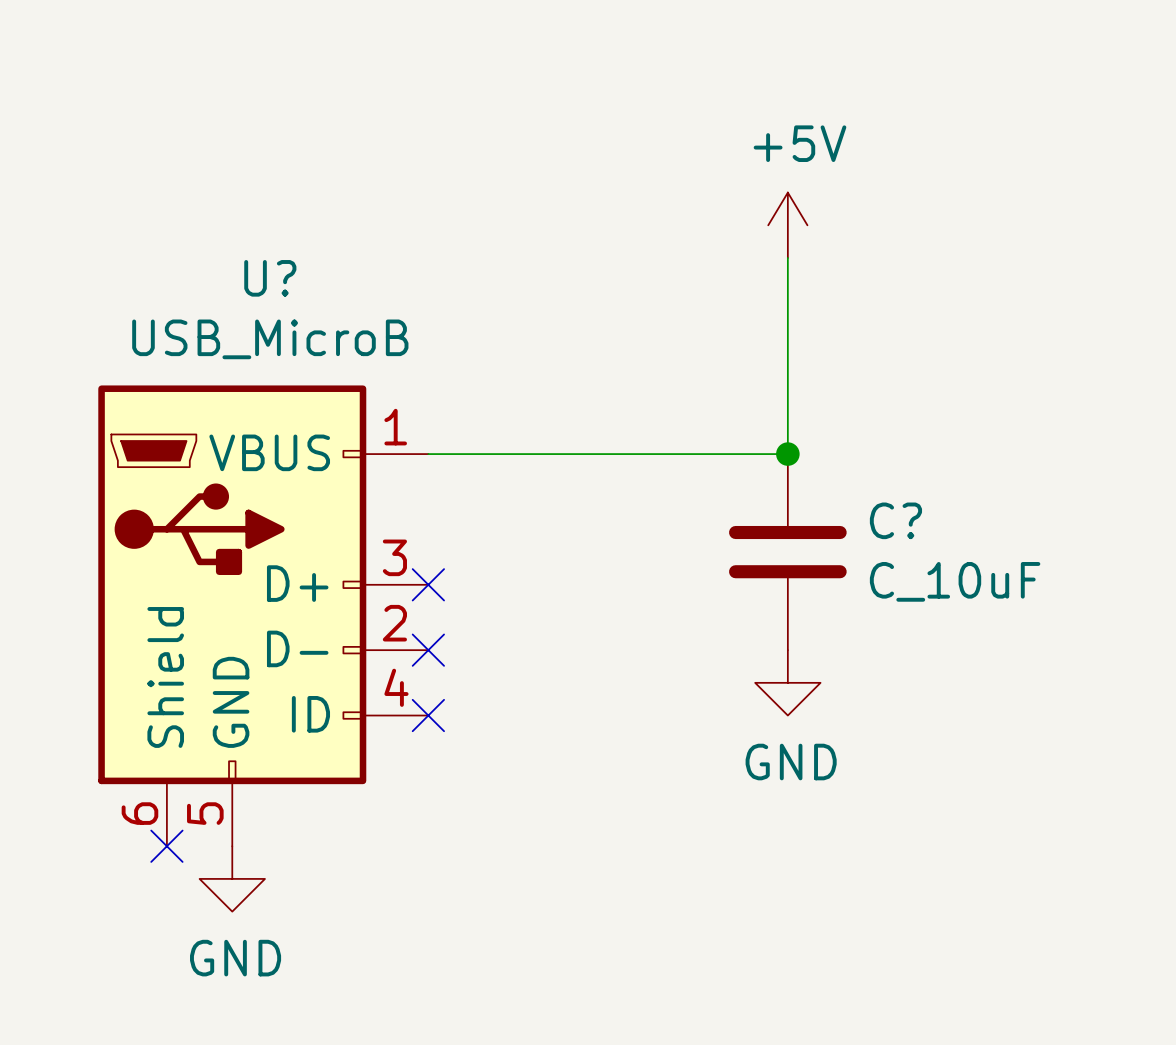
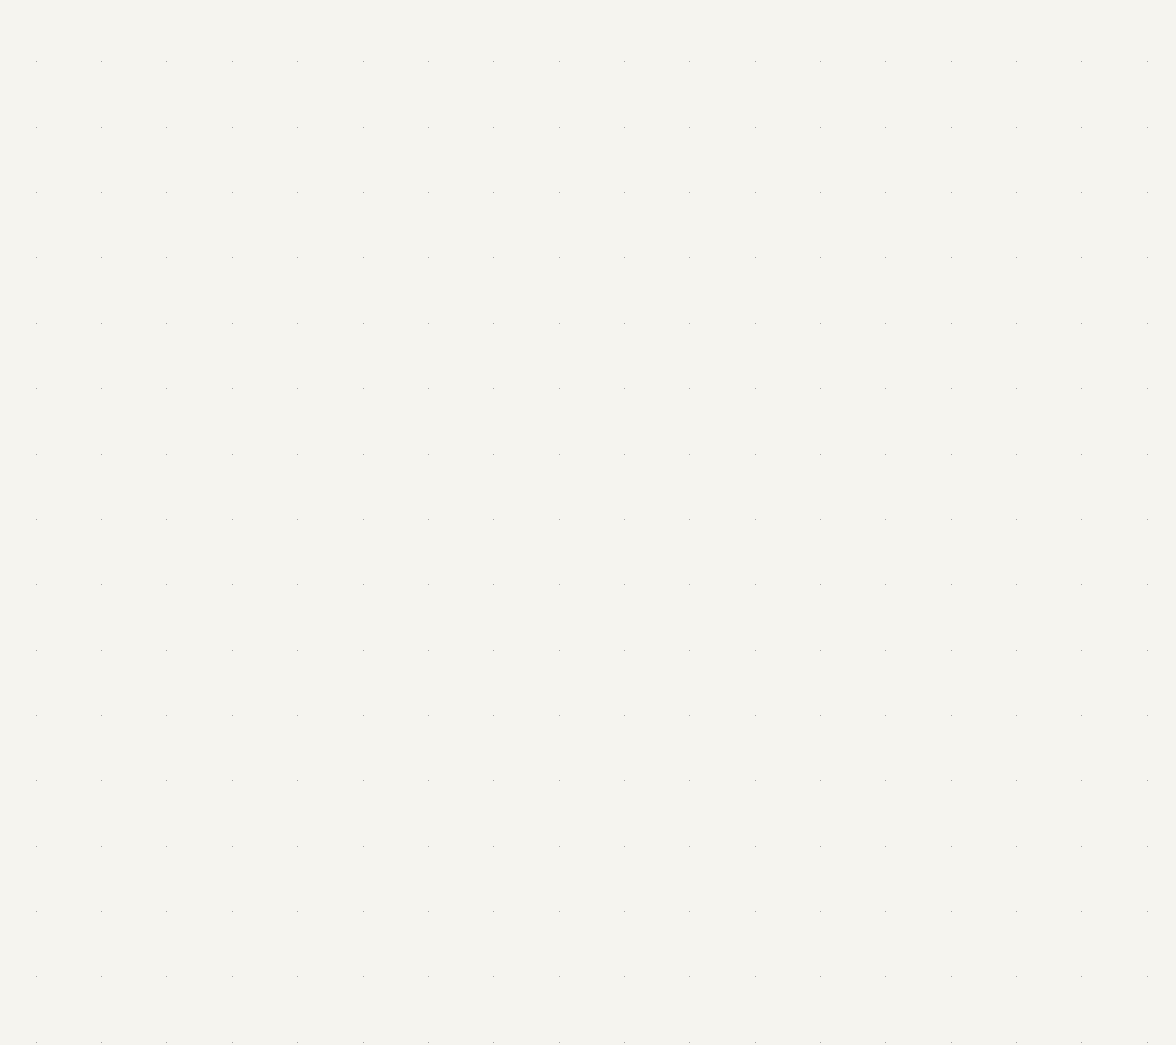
power symbol: +5V (787, 225) -> none
wire: (787, 257) (787, 454) (428, 454) -> none
junction: (787, 454) -> none
C?: C_10uF (787, 552) -> none
no-connect mark: (428, 584) -> none
U?: USB_MicroB (263, 615) -> none
no-connect mark: (428, 650) -> none
power symbol: GND (787, 682) -> none
no-connect mark: (428, 715) -> none
no-connect mark: (166, 846) -> none
power symbol: GND (232, 878) -> none

